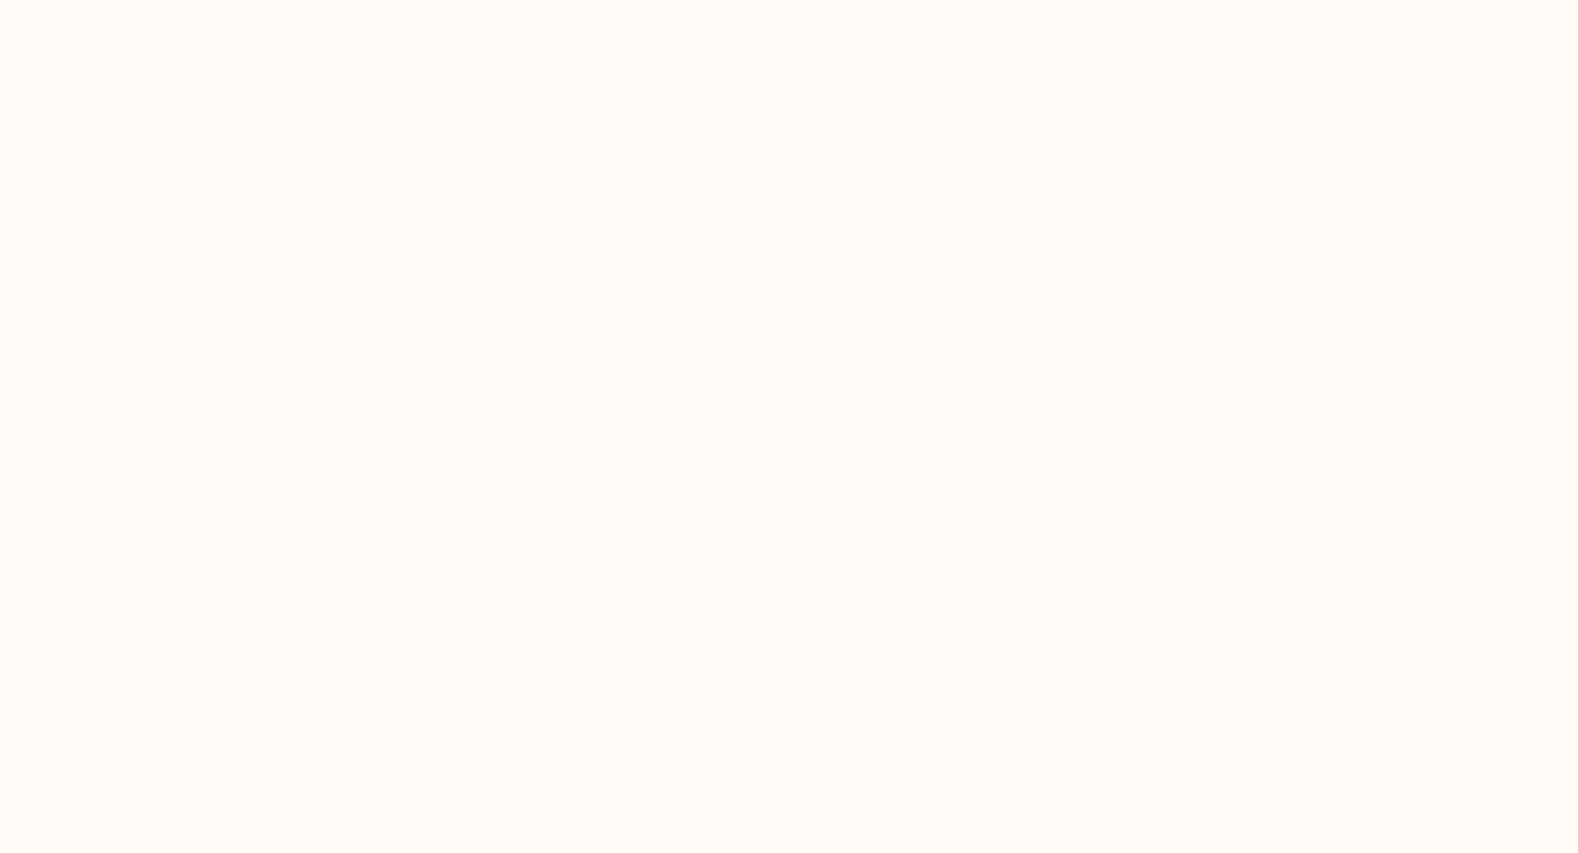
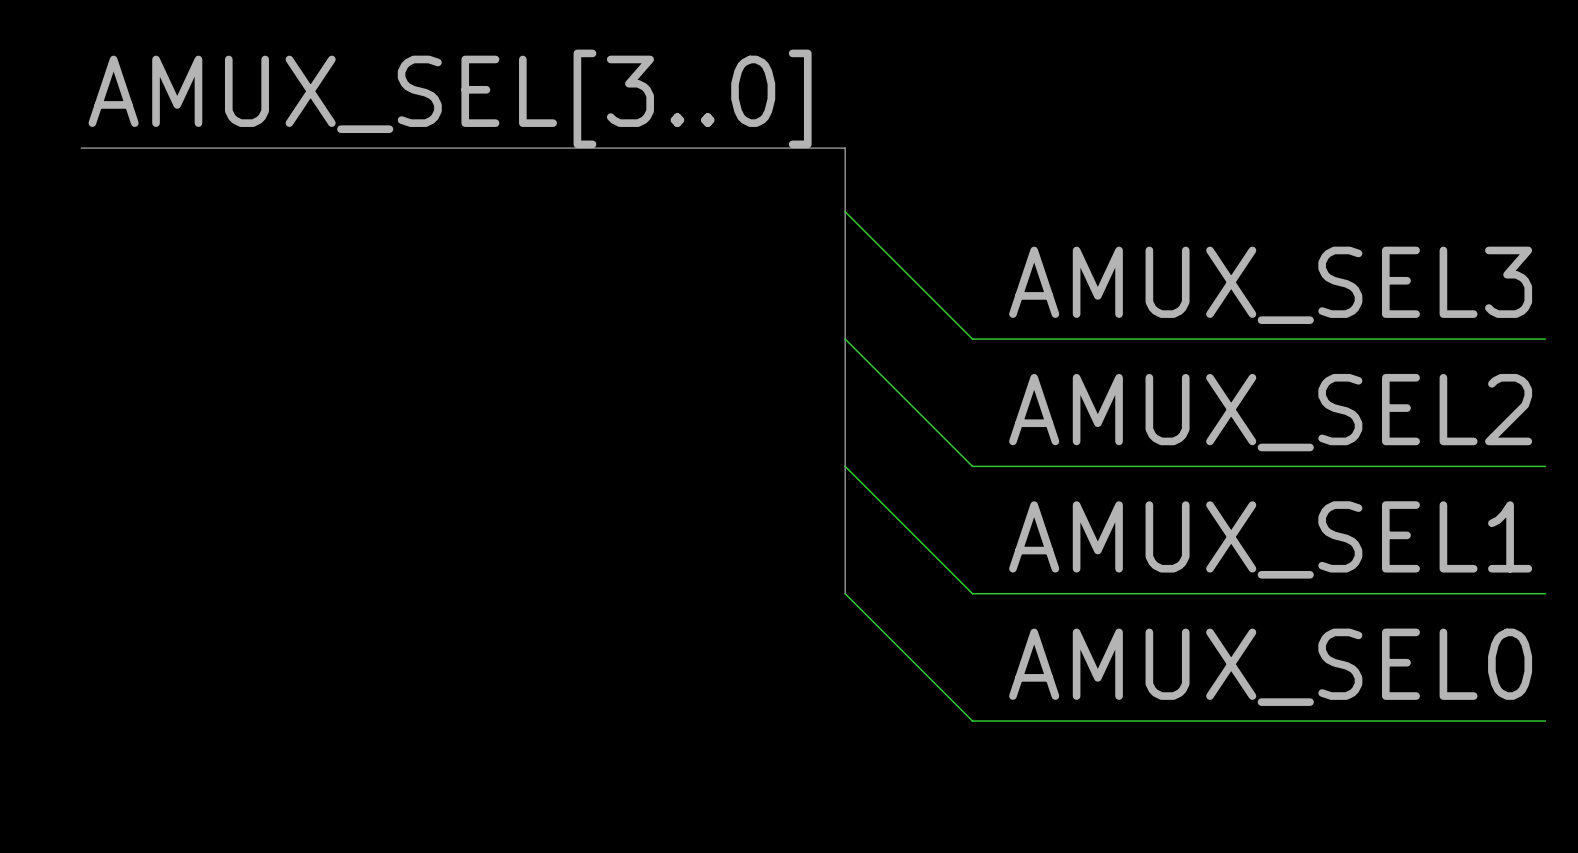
label: none -> AMUX_SEL[3..0] (450, 98)
bus: none -> (81, 148) (845, 148) (845, 593)
wire: none -> (845, 211) (972, 339) (1545, 339)
label: none -> AMUX_SEL3 (1270, 285)
wire: none -> (845, 339) (972, 466) (1545, 466)
label: none -> AMUX_SEL2 (1270, 412)
wire: none -> (845, 466) (972, 593) (1545, 593)
label: none -> AMUX_SEL1 (1270, 539)
wire: none -> (845, 593) (972, 721) (1545, 721)
label: none -> AMUX_SEL0 (1270, 667)

